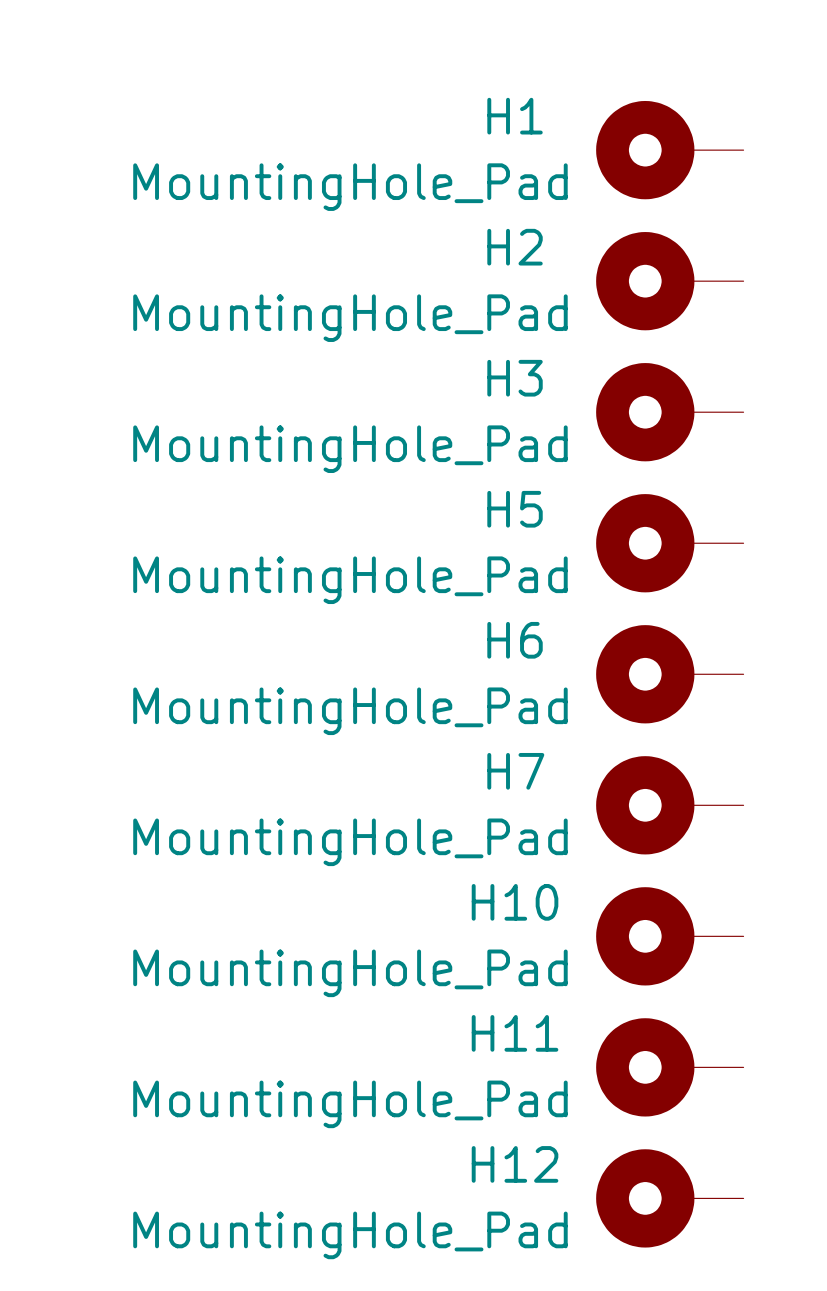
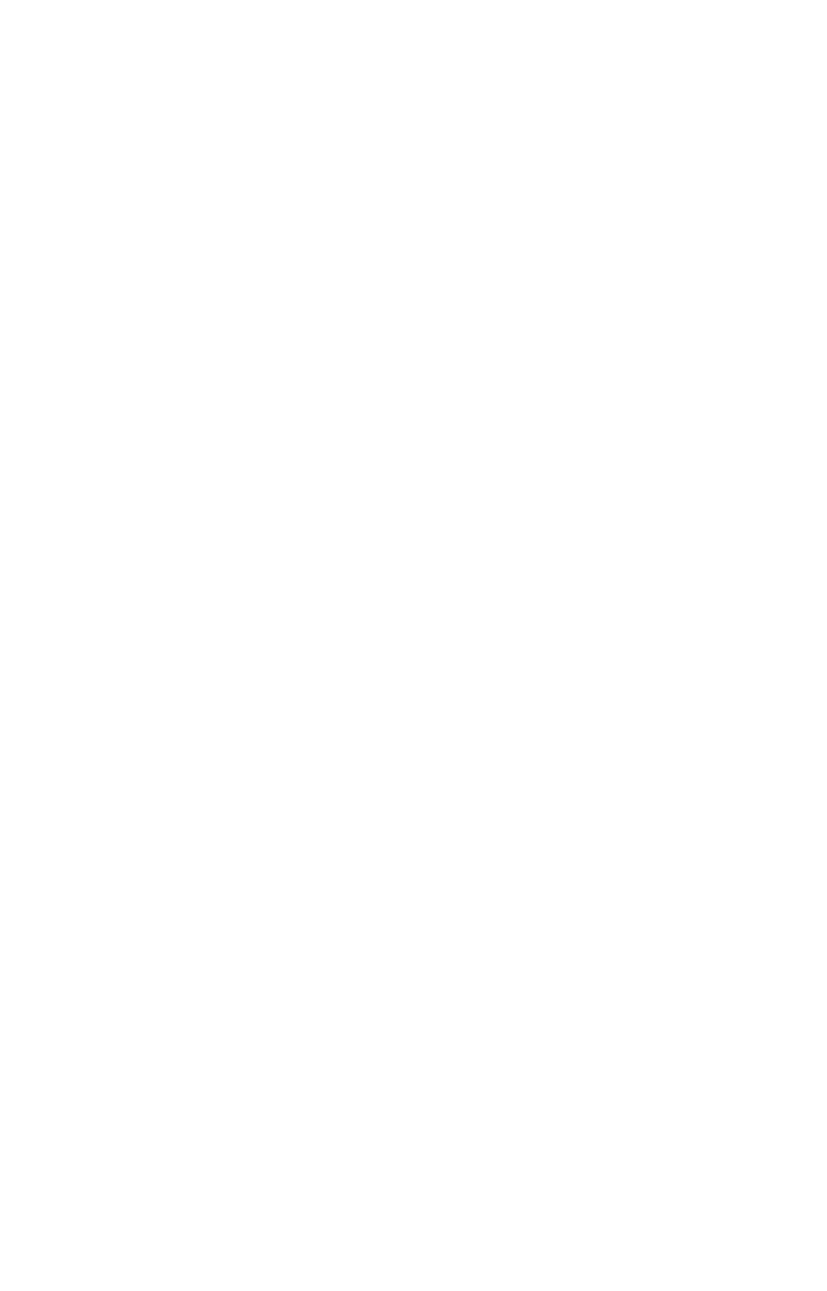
H1: MountingHole_Pad (669, 150) -> none
H2: MountingHole_Pad (669, 281) -> none
H3: MountingHole_Pad (669, 412) -> none
H5: MountingHole_Pad (669, 543) -> none
H6: MountingHole_Pad (669, 674) -> none
H7: MountingHole_Pad (669, 805) -> none
H10: MountingHole_Pad (669, 936) -> none
H11: MountingHole_Pad (669, 1067) -> none
H12: MountingHole_Pad (669, 1198) -> none

